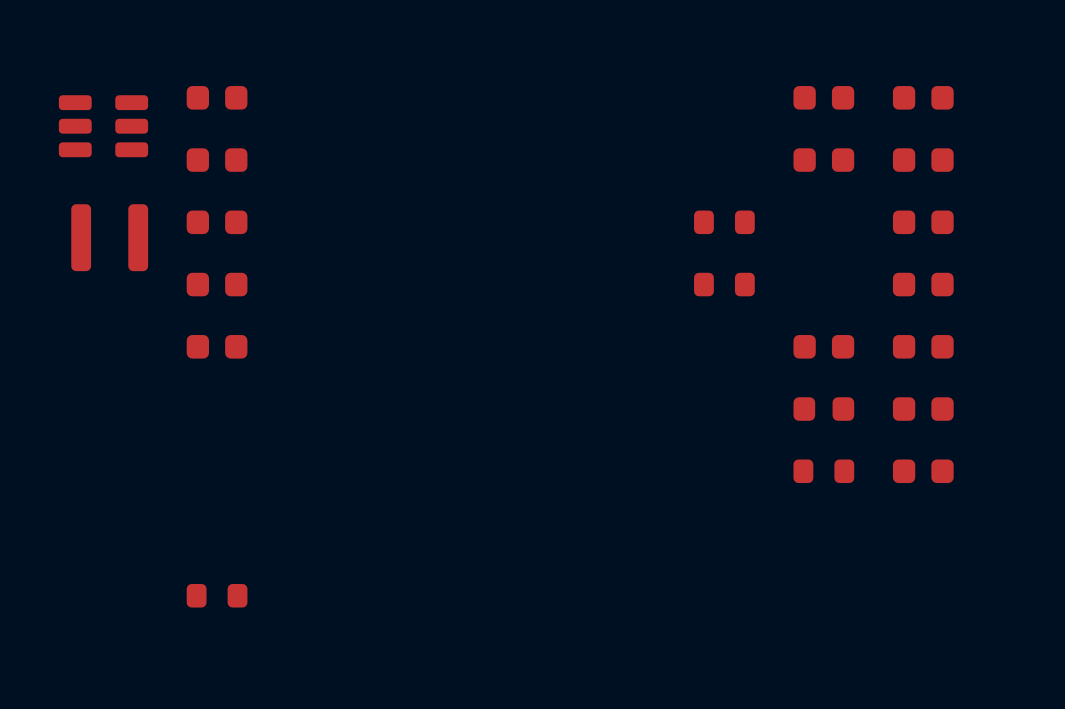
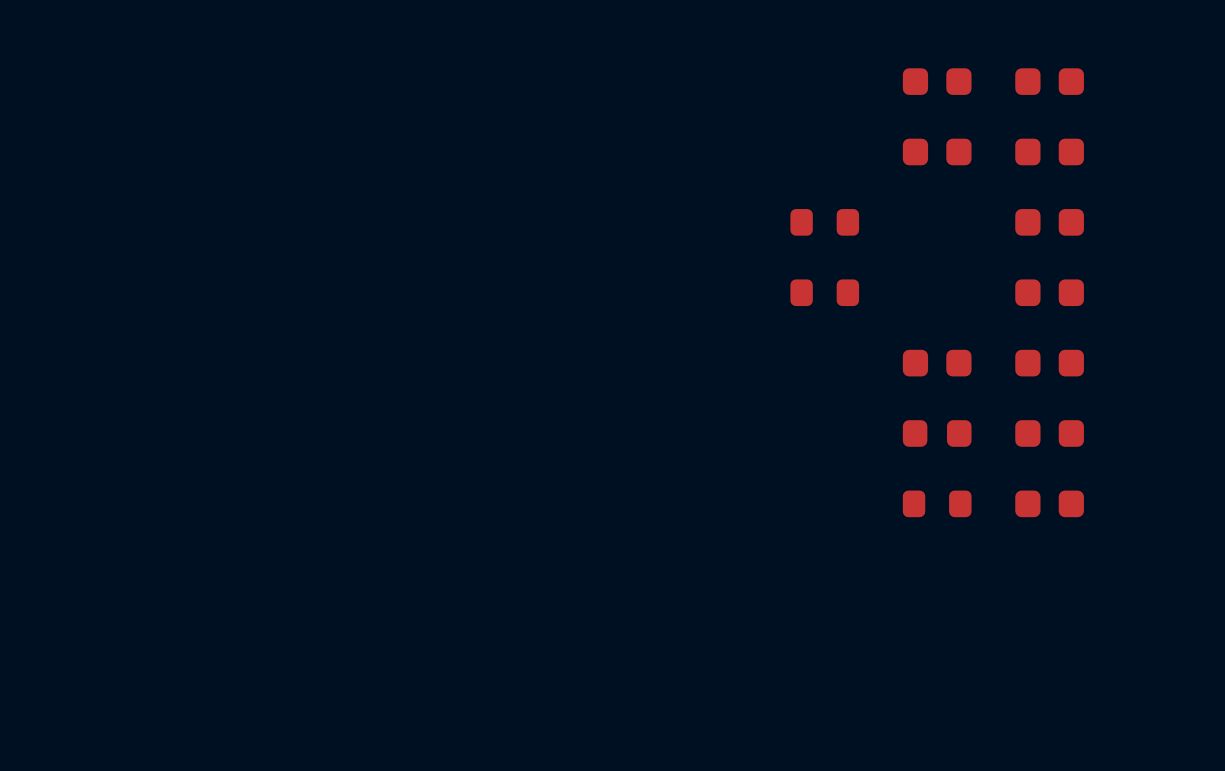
part: (217, 97) -> none
part: (103, 126) -> none
part: (217, 160) -> none
part: (217, 222) -> none
part: (109, 237) -> none
part: (217, 284) -> none
part: (217, 346) -> none
part: (217, 595) -> none

